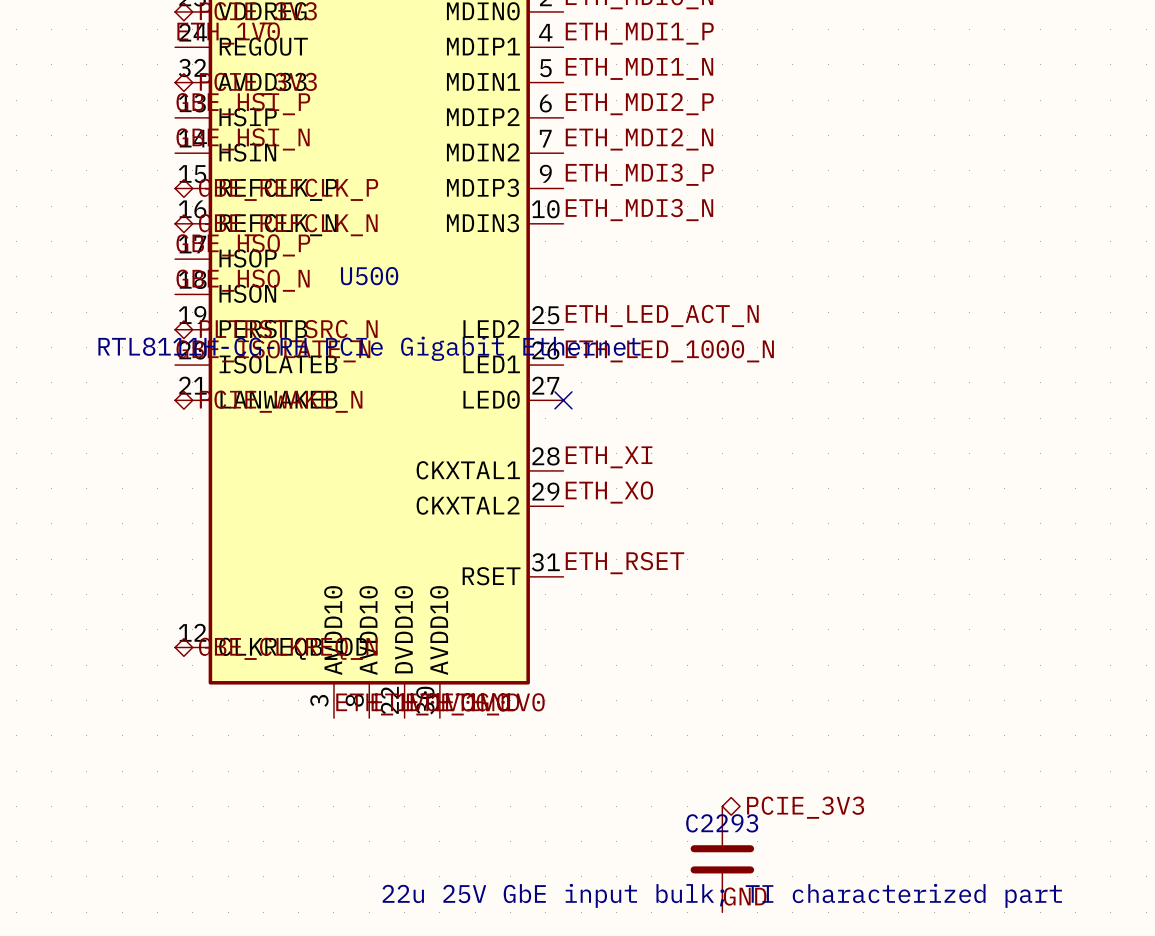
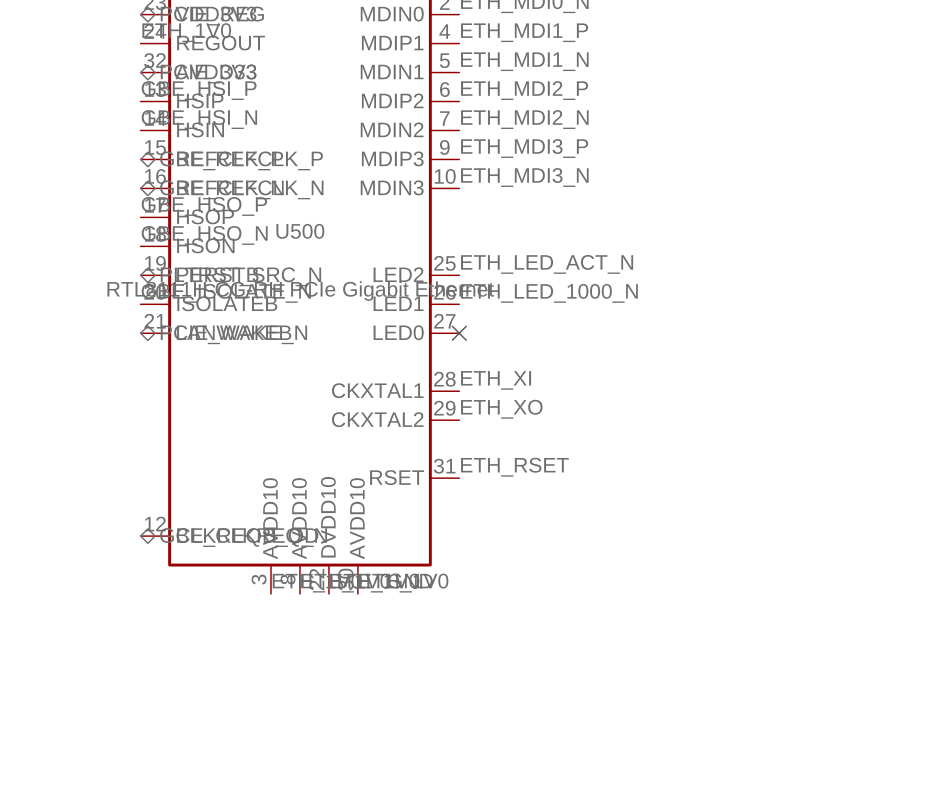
hierarchical label: PCIE_3V3 (805, 807) -> none
C2293: 22u 25V GbE input bulk; TI characterized part (722, 859) -> none
label: GND (745, 896) -> none

